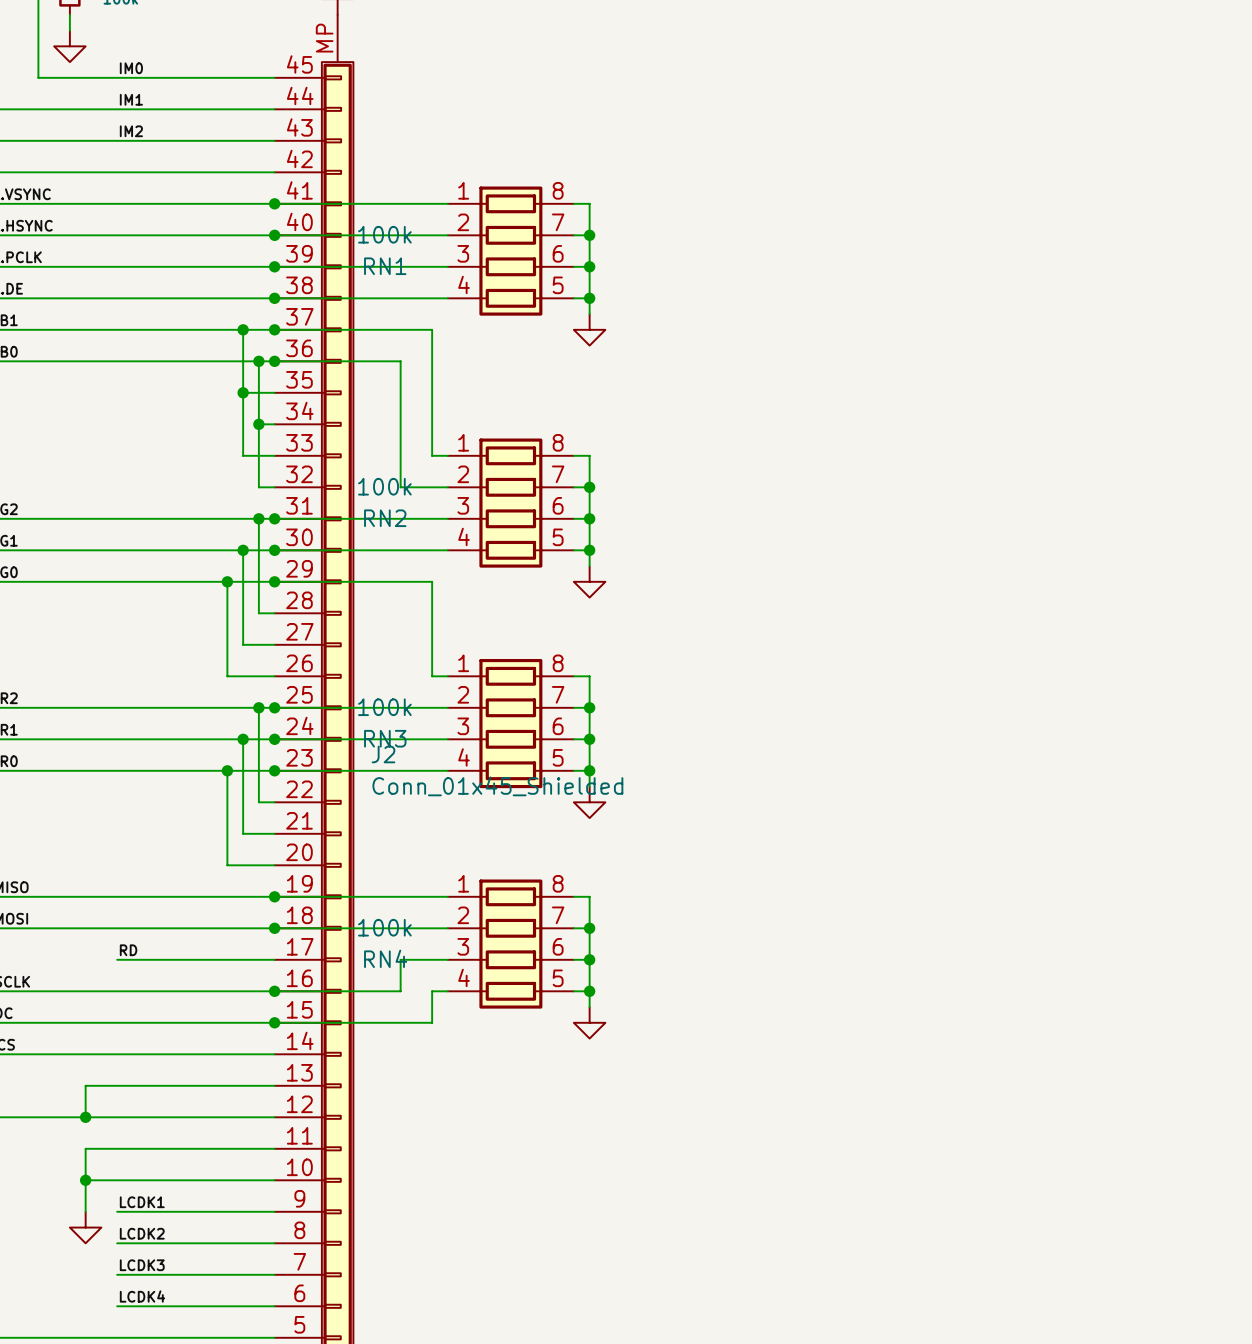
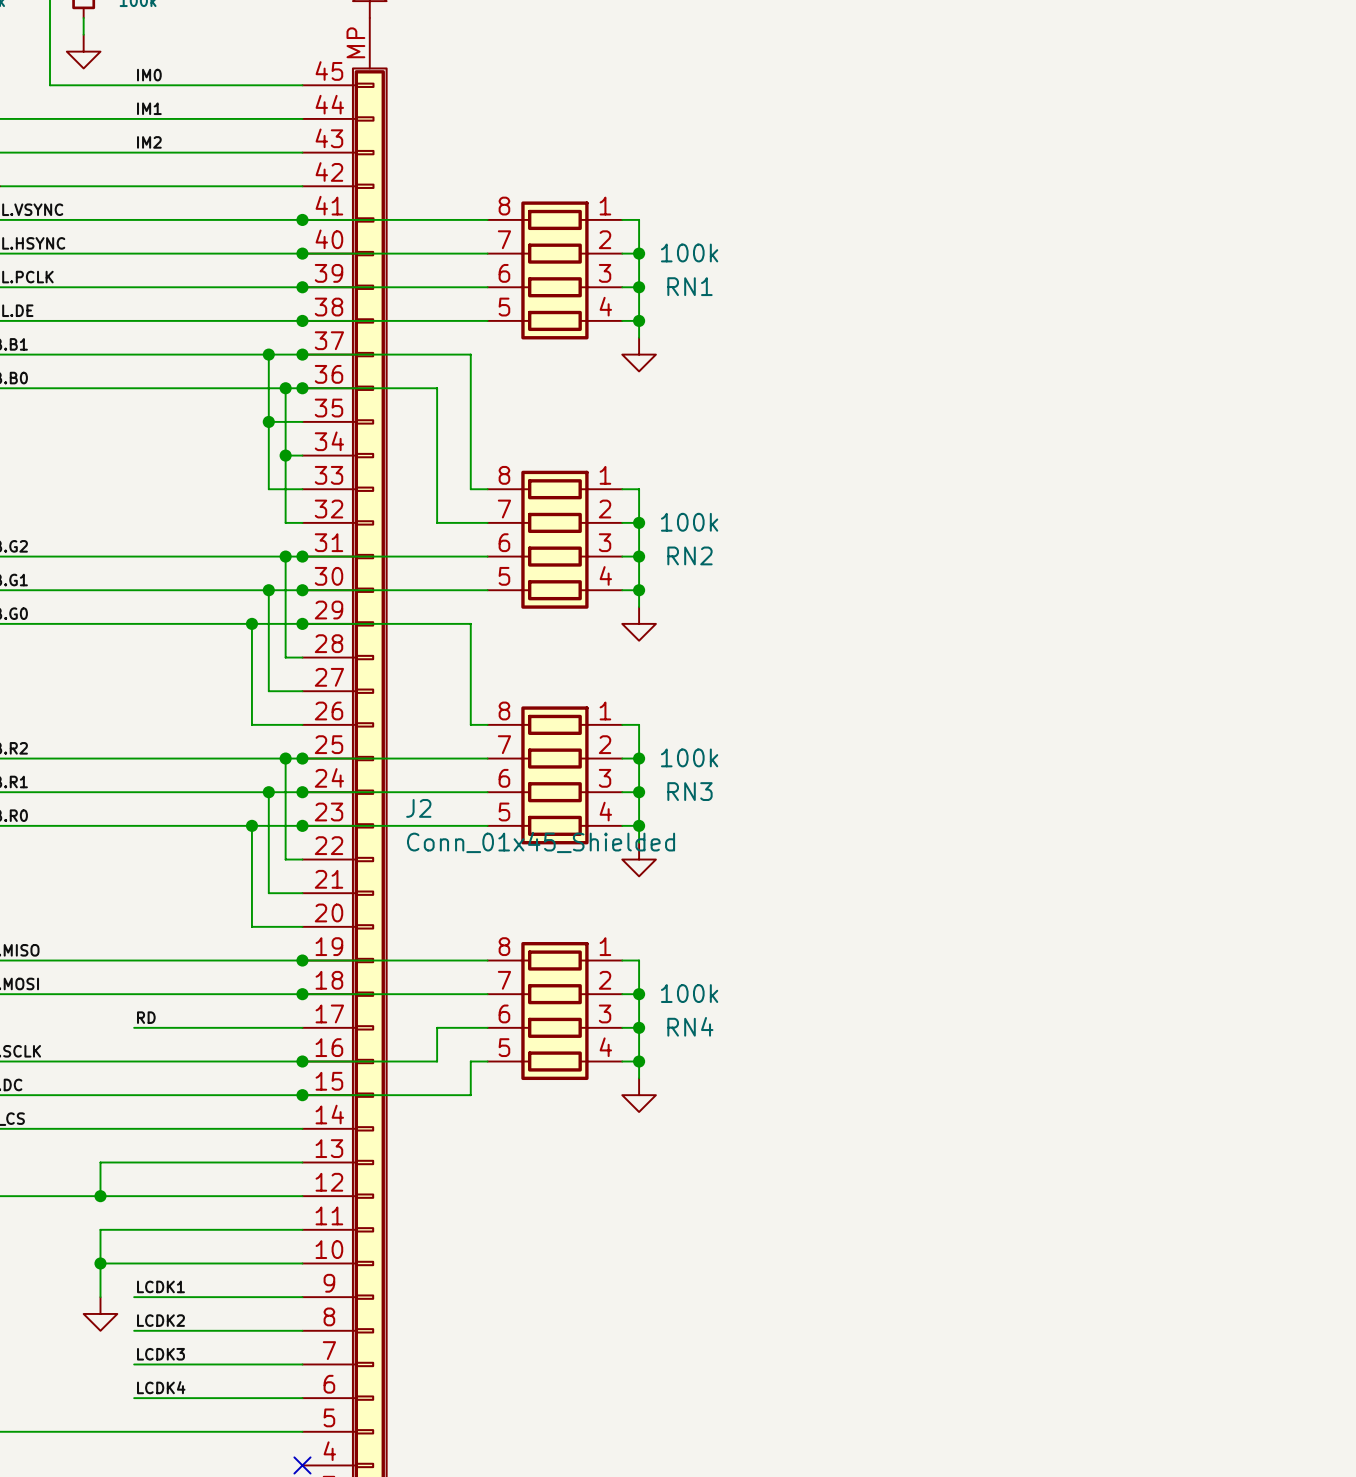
RN1 flip: as is (510, 251) -> left-right (554, 270)
RN2 flip: as is (510, 503) -> left-right (554, 539)
RN3 flip: as is (510, 723) -> left-right (554, 775)
RN4 flip: as is (510, 944) -> left-right (554, 1011)

